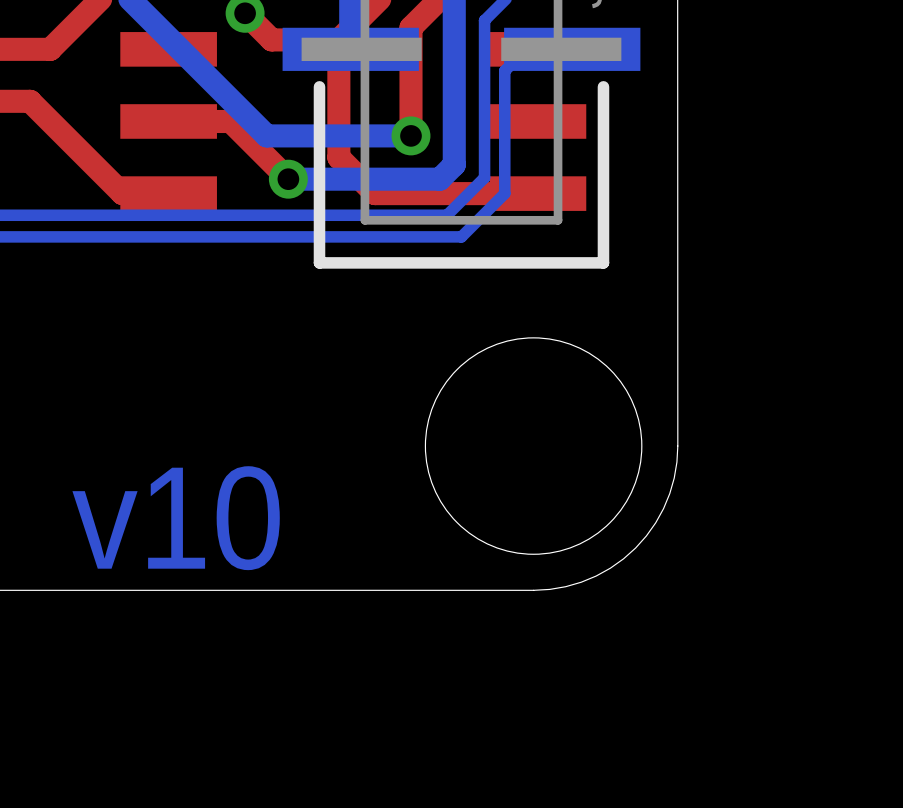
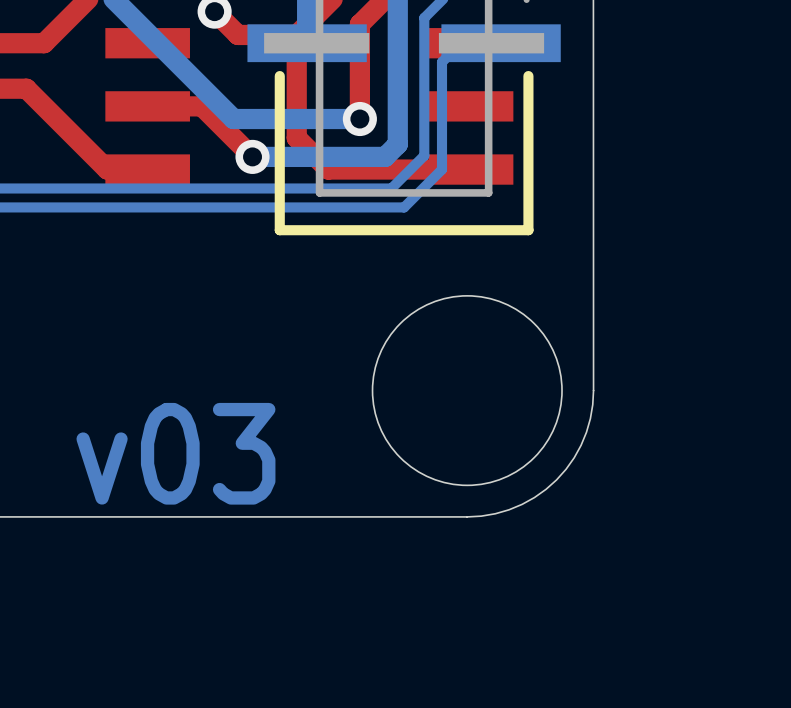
text: v10 (176, 518) -> v03 (175, 453)

